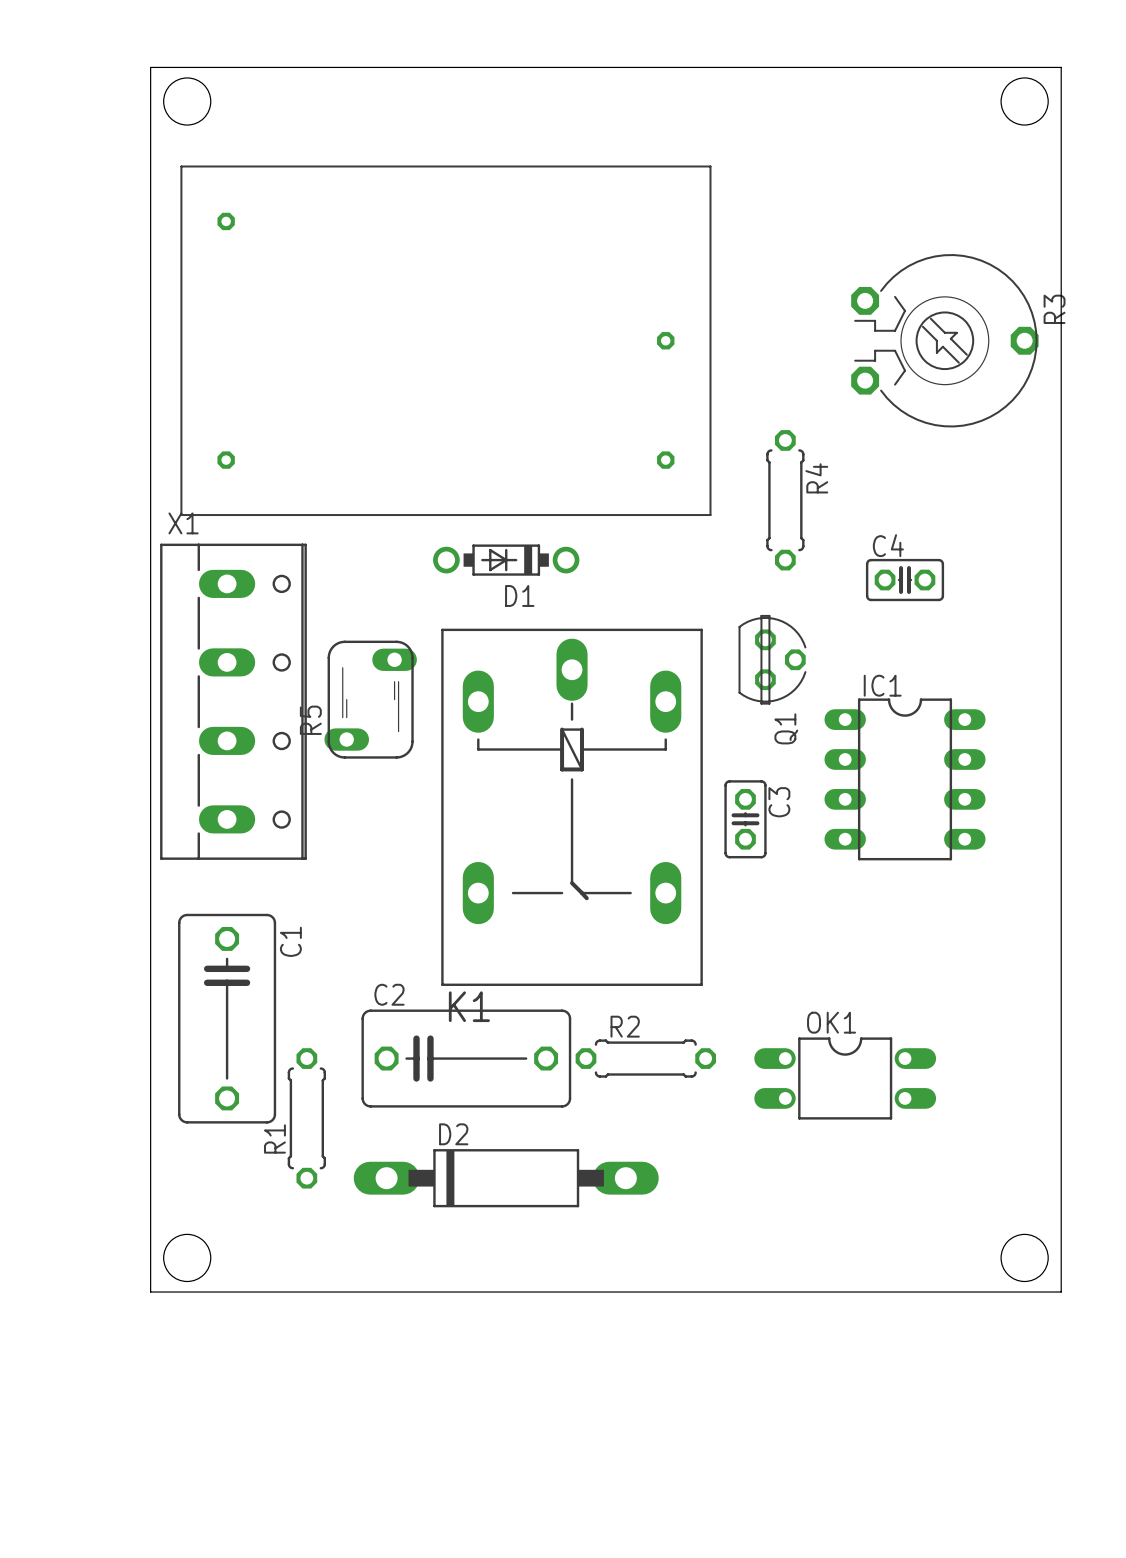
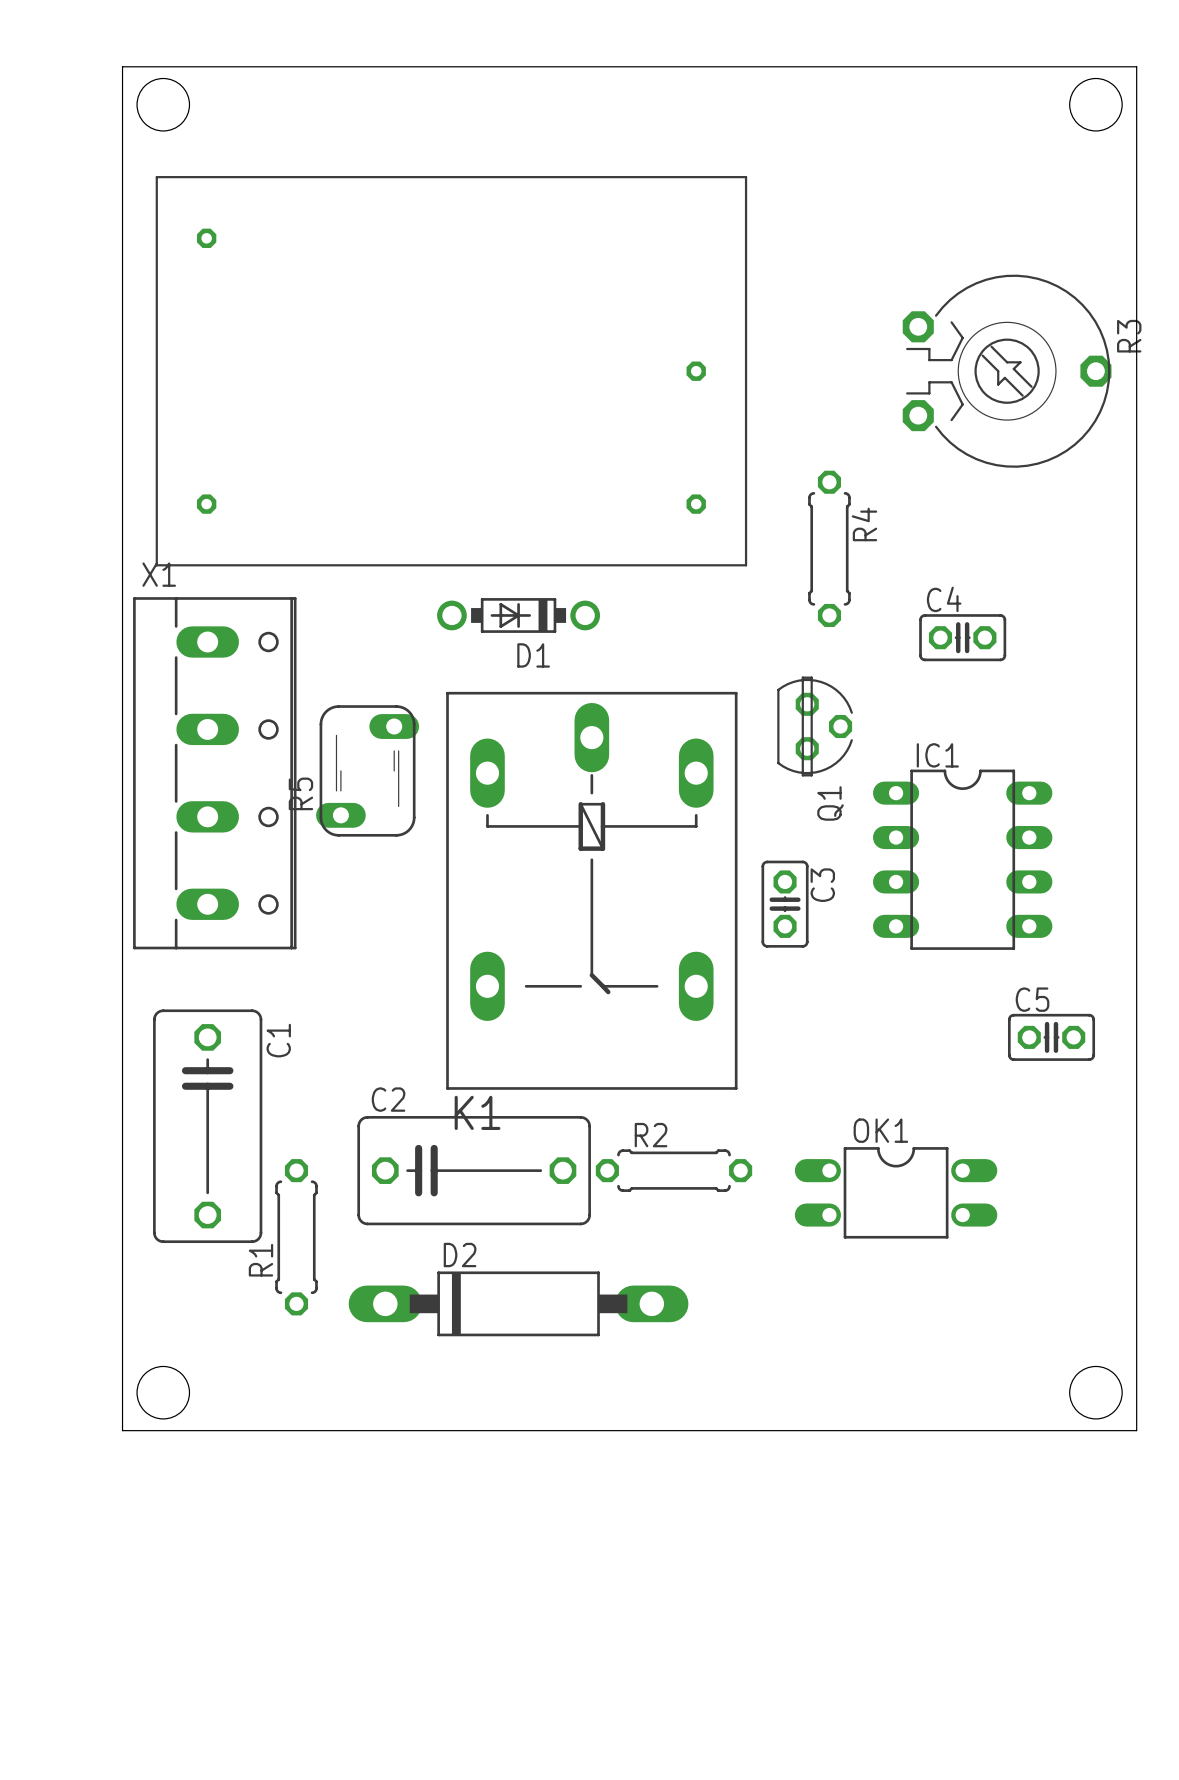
C5: none -> (1051, 1037)

